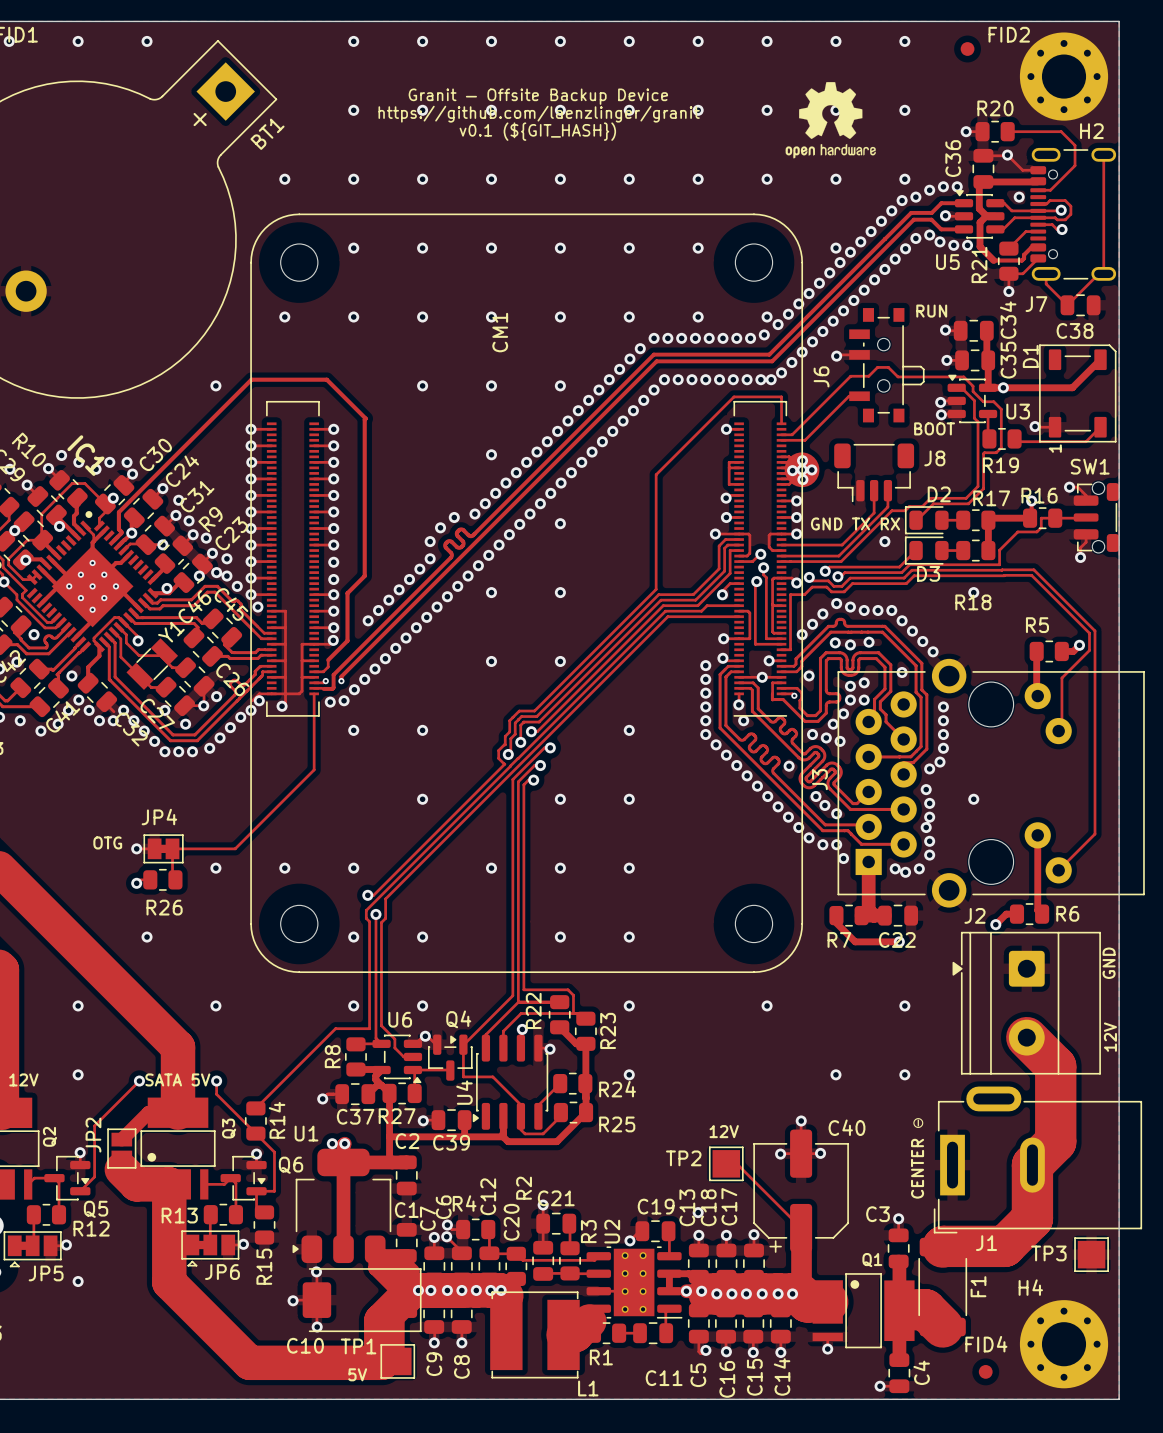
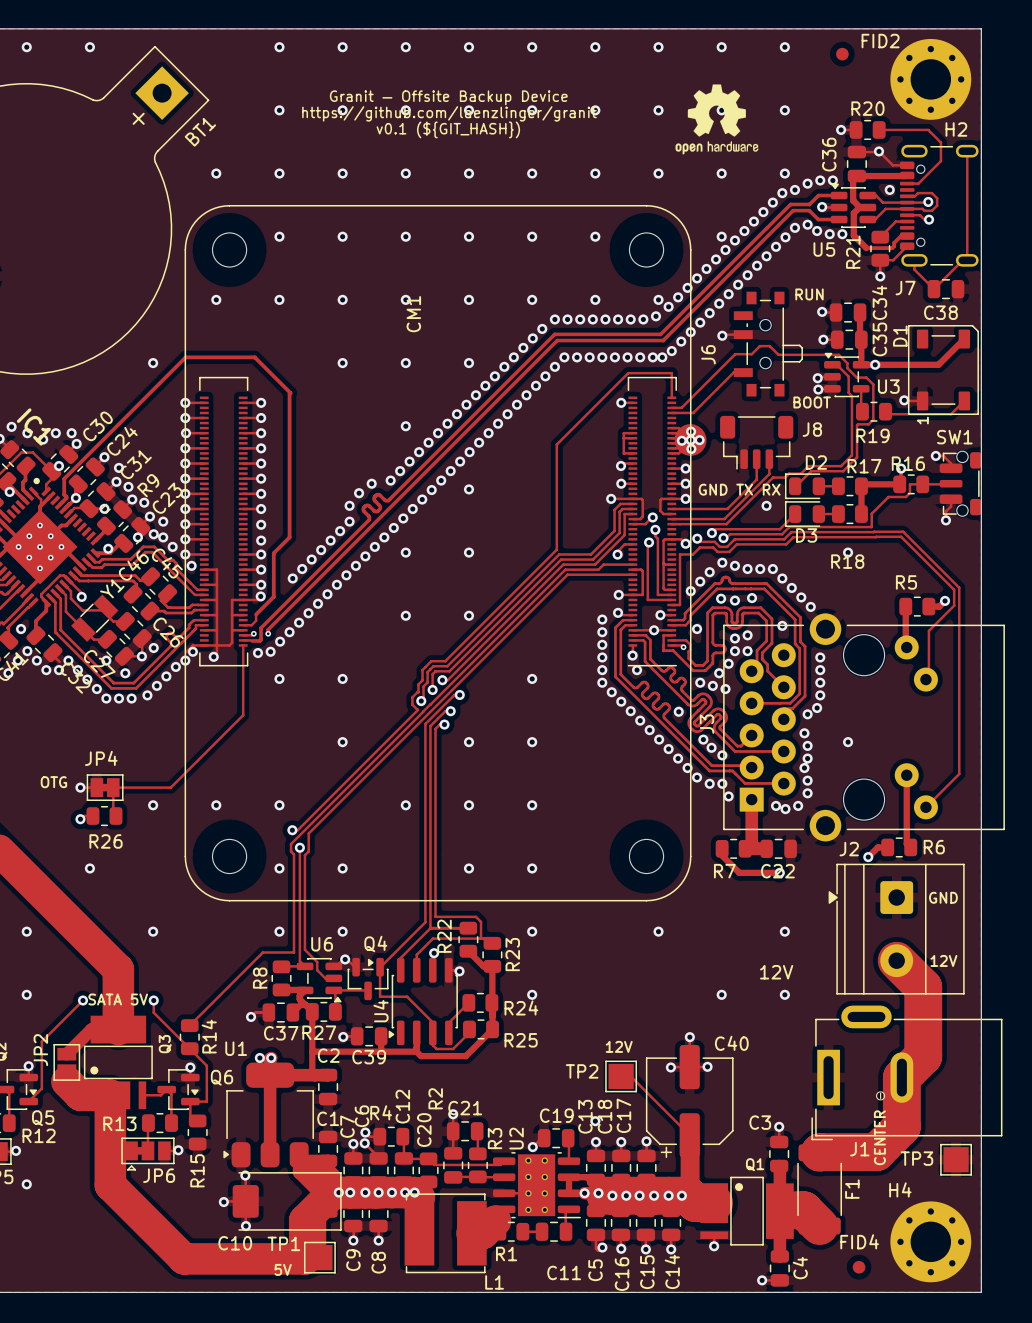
text rotation: 0° (1109, 963) -> 90° clockwise (943, 897)
text rotation: 0° (1110, 1037) -> 90° clockwise (943, 960)
text: none -> 12V (776, 972)
text position: CENTER ⊖ (917, 1157) -> CENTER ⊖ (879, 1127)

